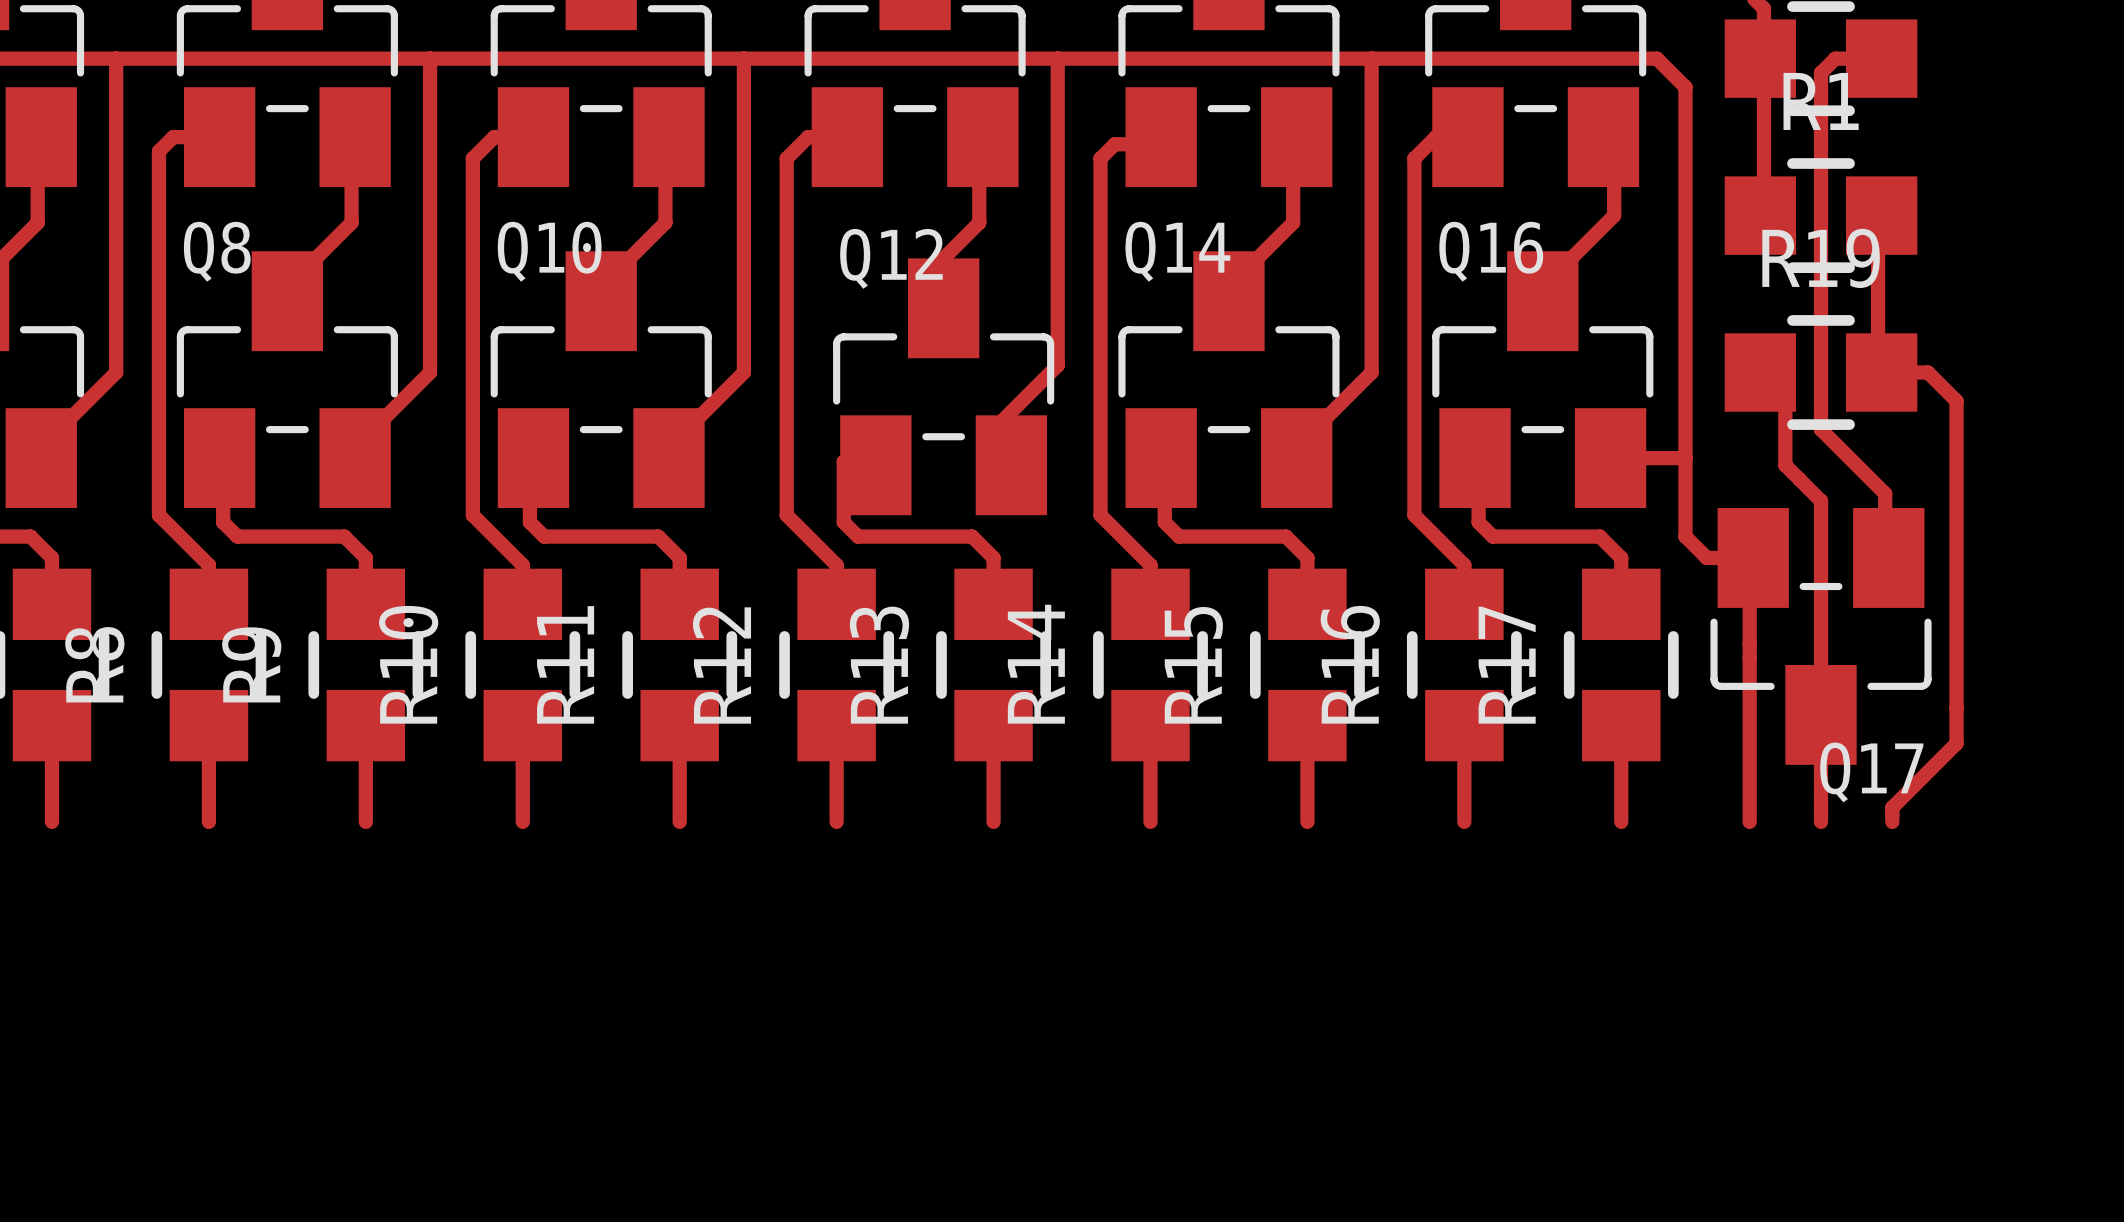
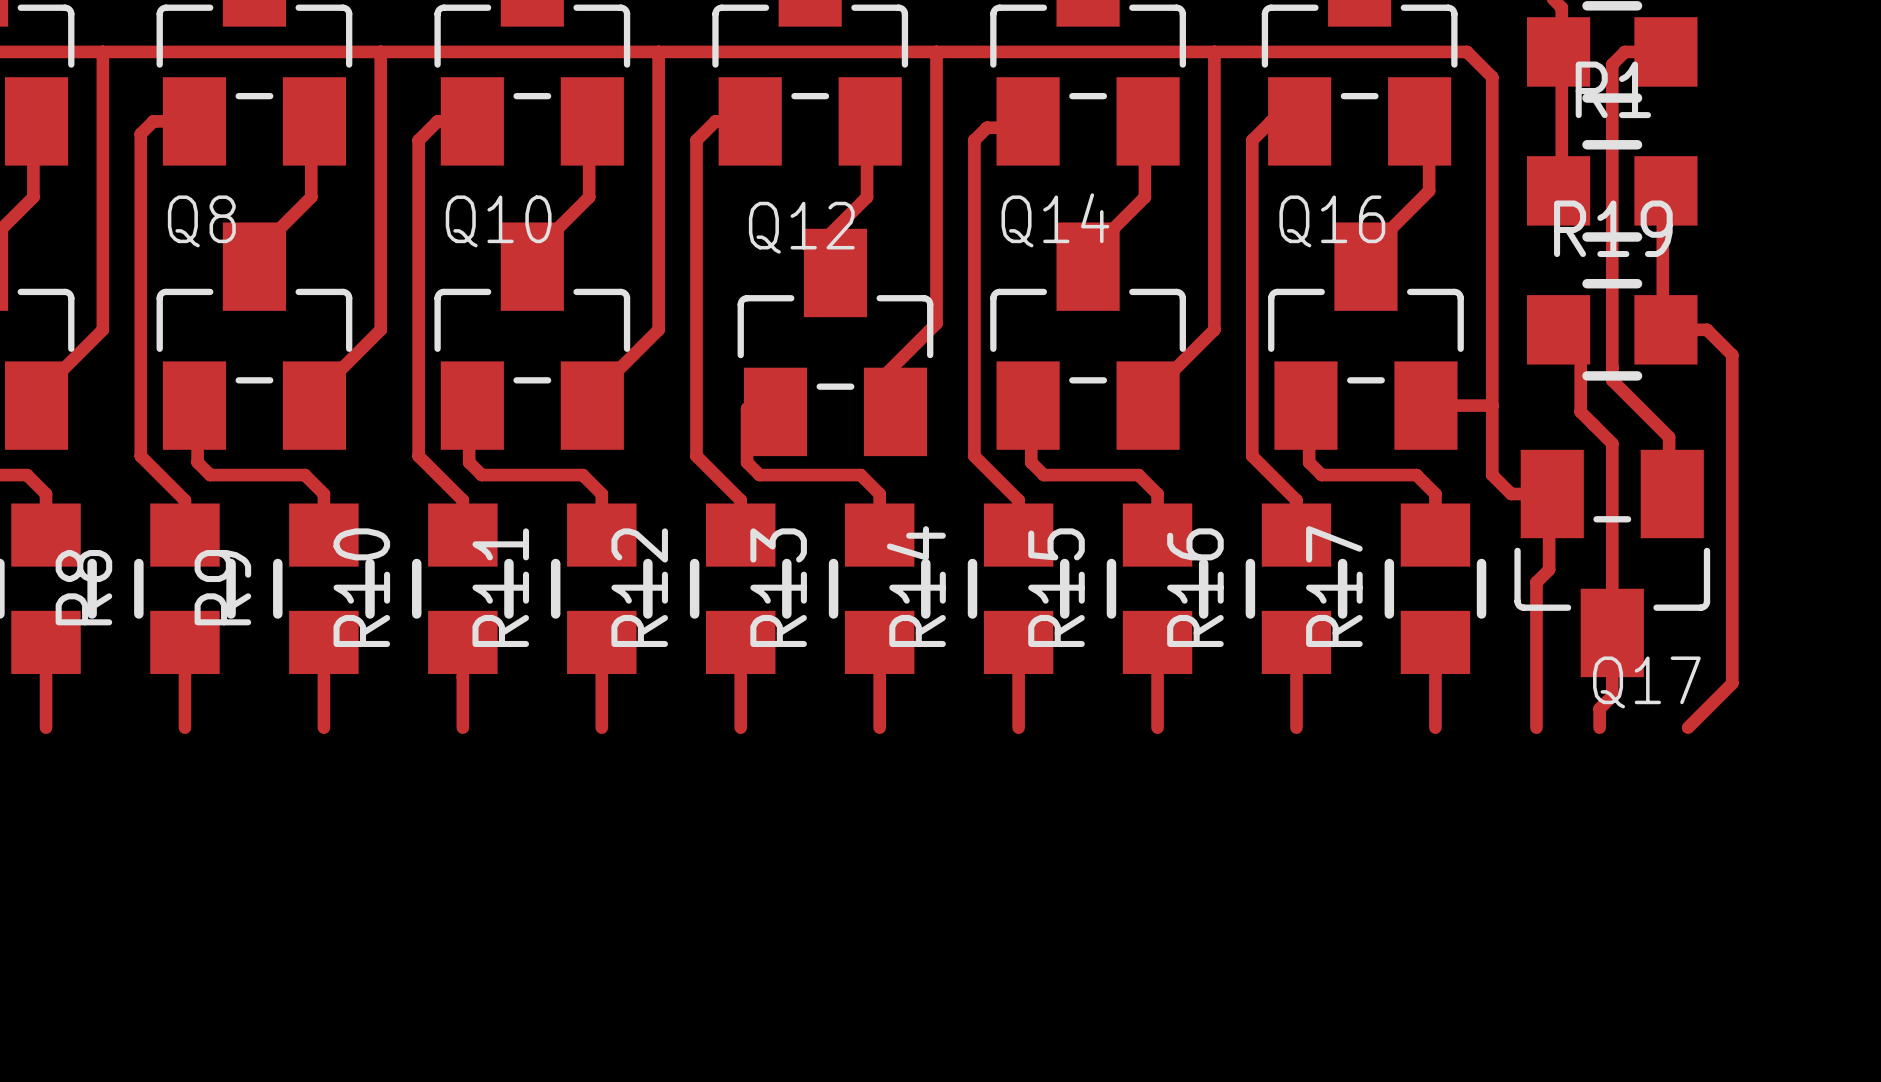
track: (1749, 643) (1749, 821) -> (1549, 569) (1536, 582) (1536, 727)
track: (1956, 743) (1892, 807) (1892, 821) -> (1732, 658) (1732, 683) (1688, 727)
track: (1821, 786) (1821, 821) -> (1612, 696) (1599, 708) (1599, 727)

